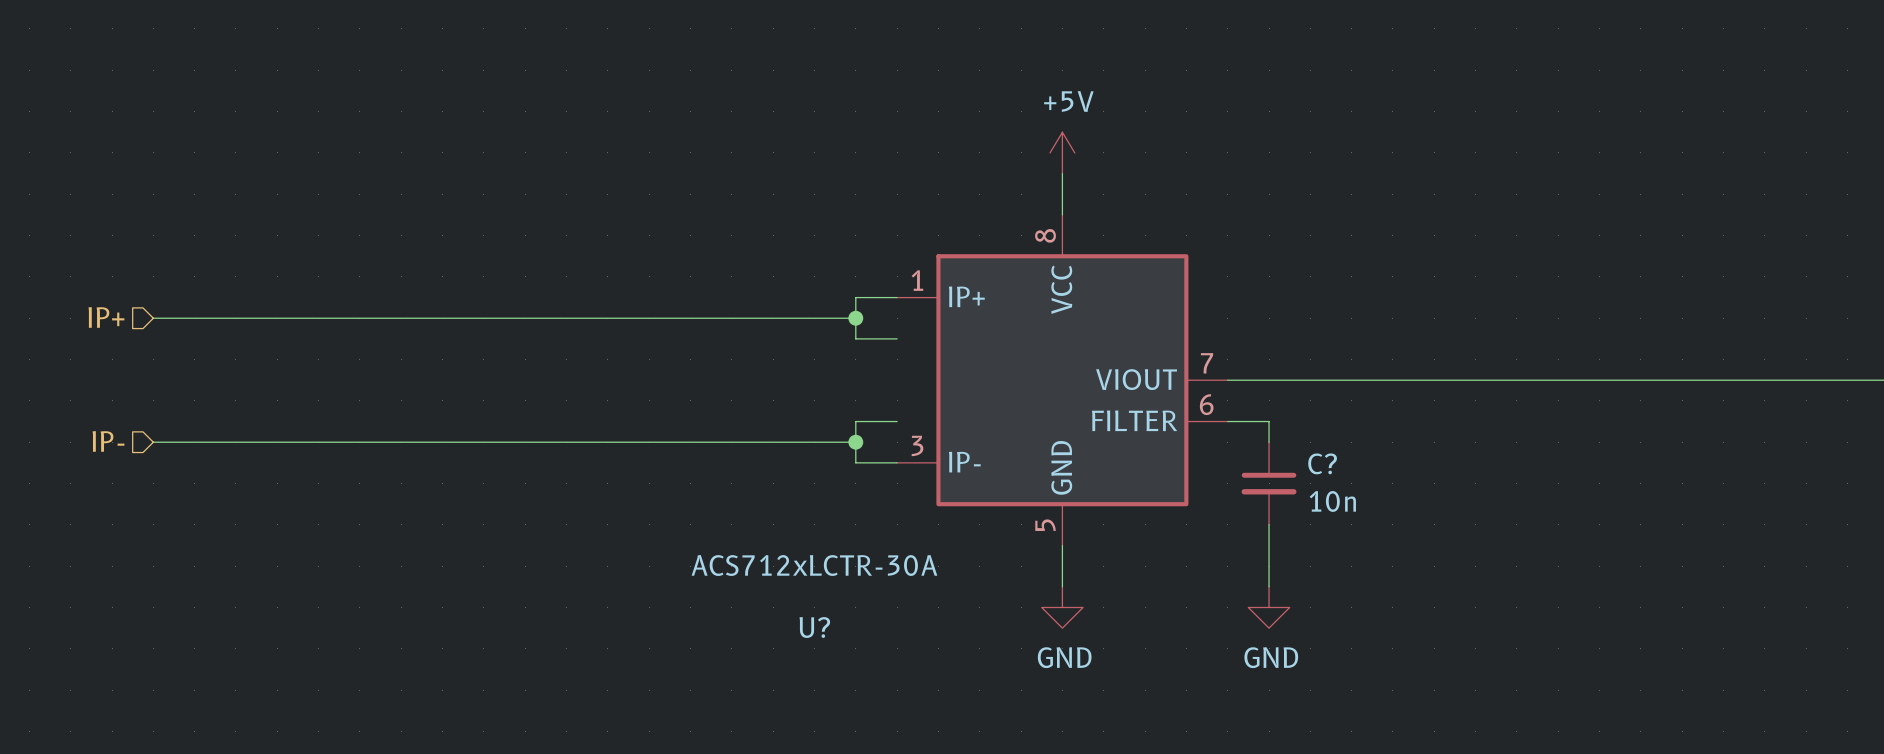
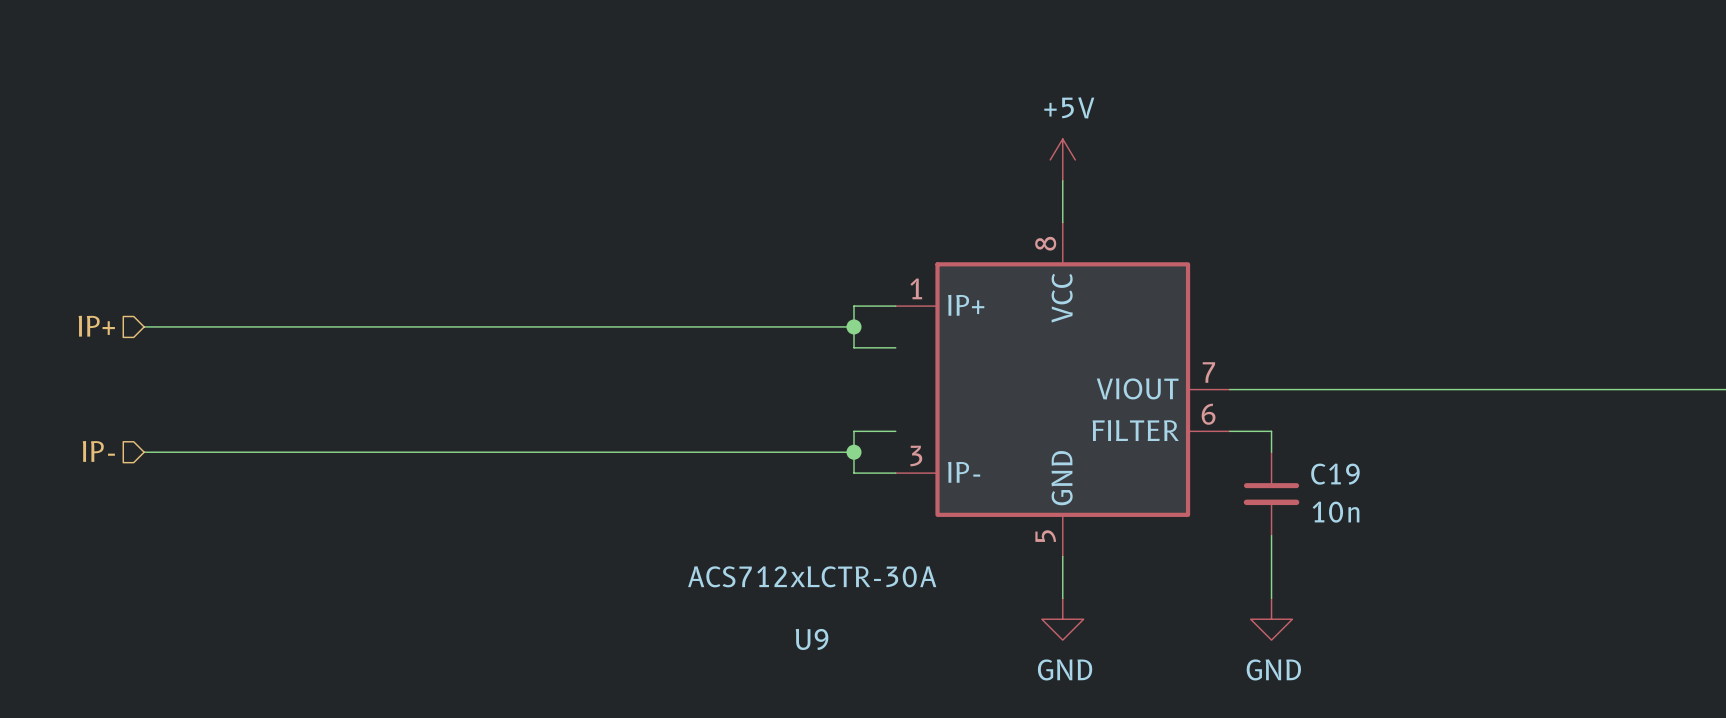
C? name: C? (1322, 463) -> C19 (1335, 474)
U? name: U? (814, 627) -> U9 (812, 639)

